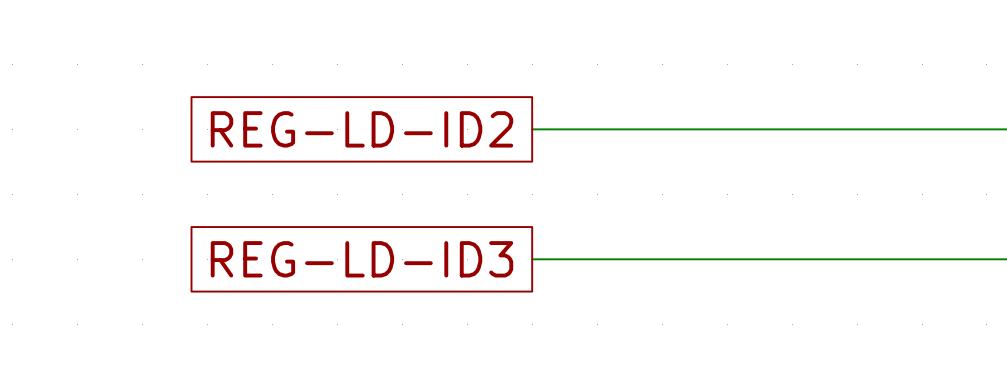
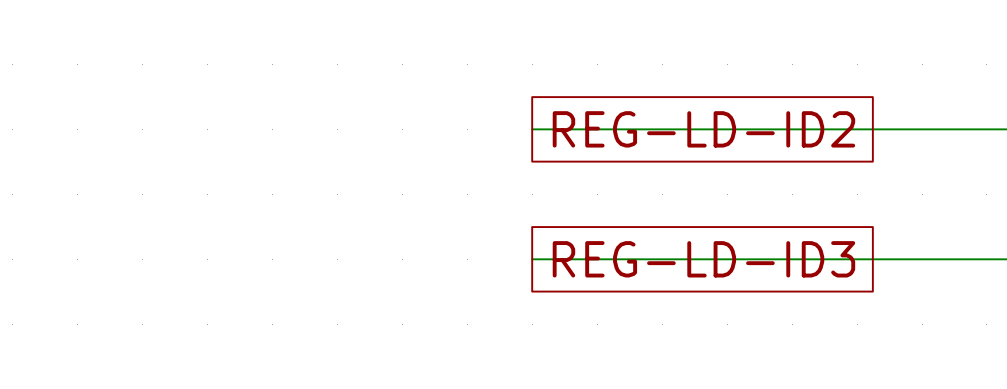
global label rotation: 0° (361, 129) -> 180° (703, 129)
global label rotation: 0° (361, 259) -> 180° (703, 259)

